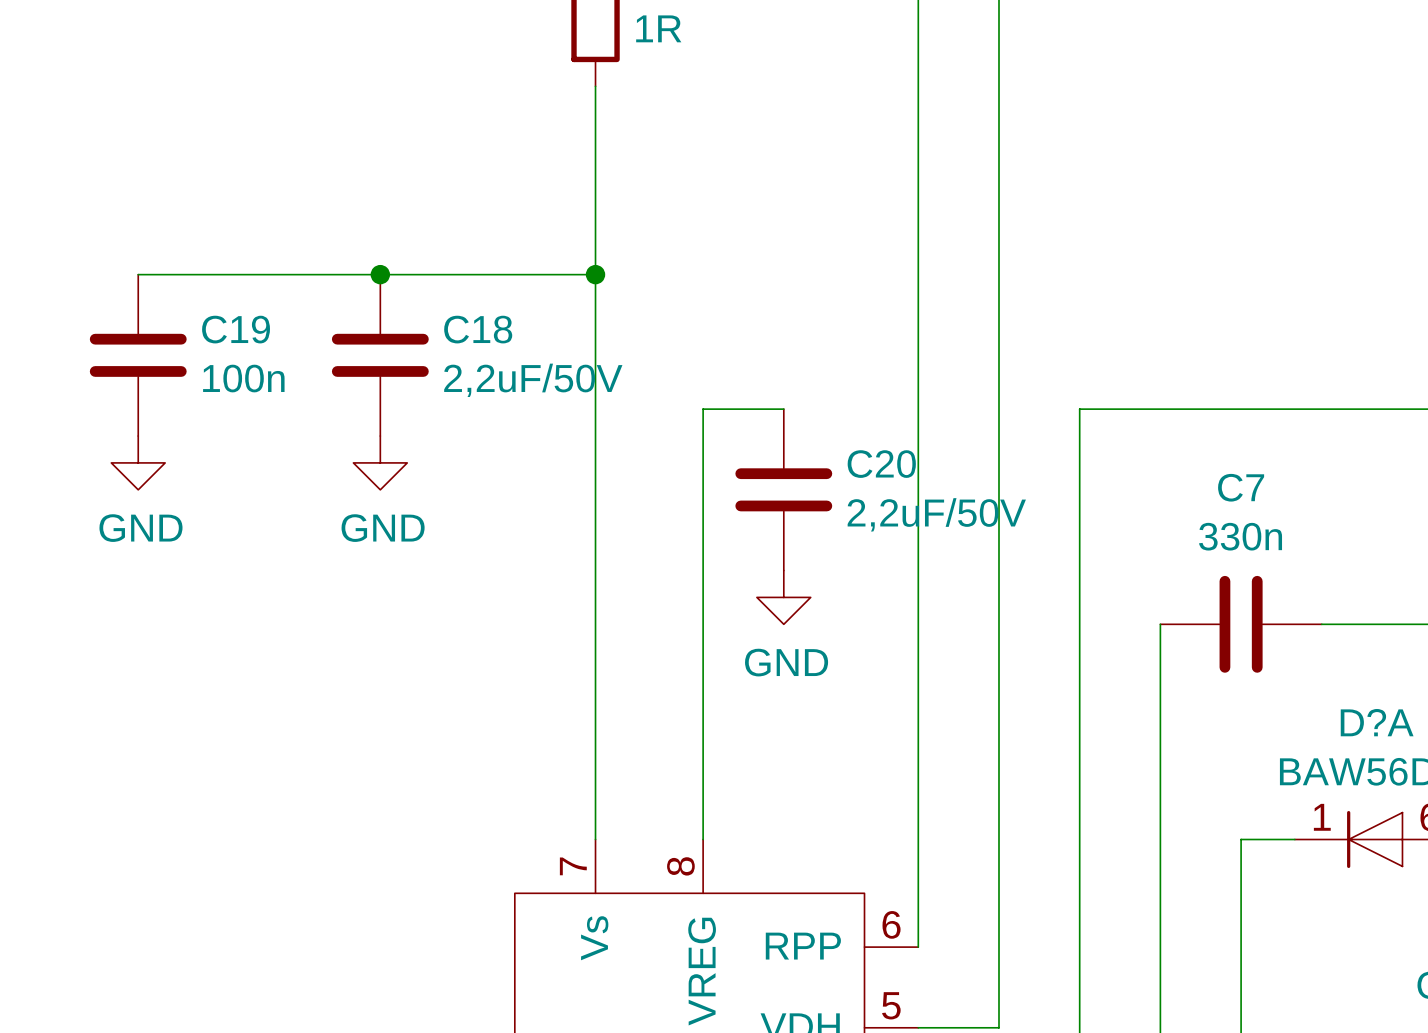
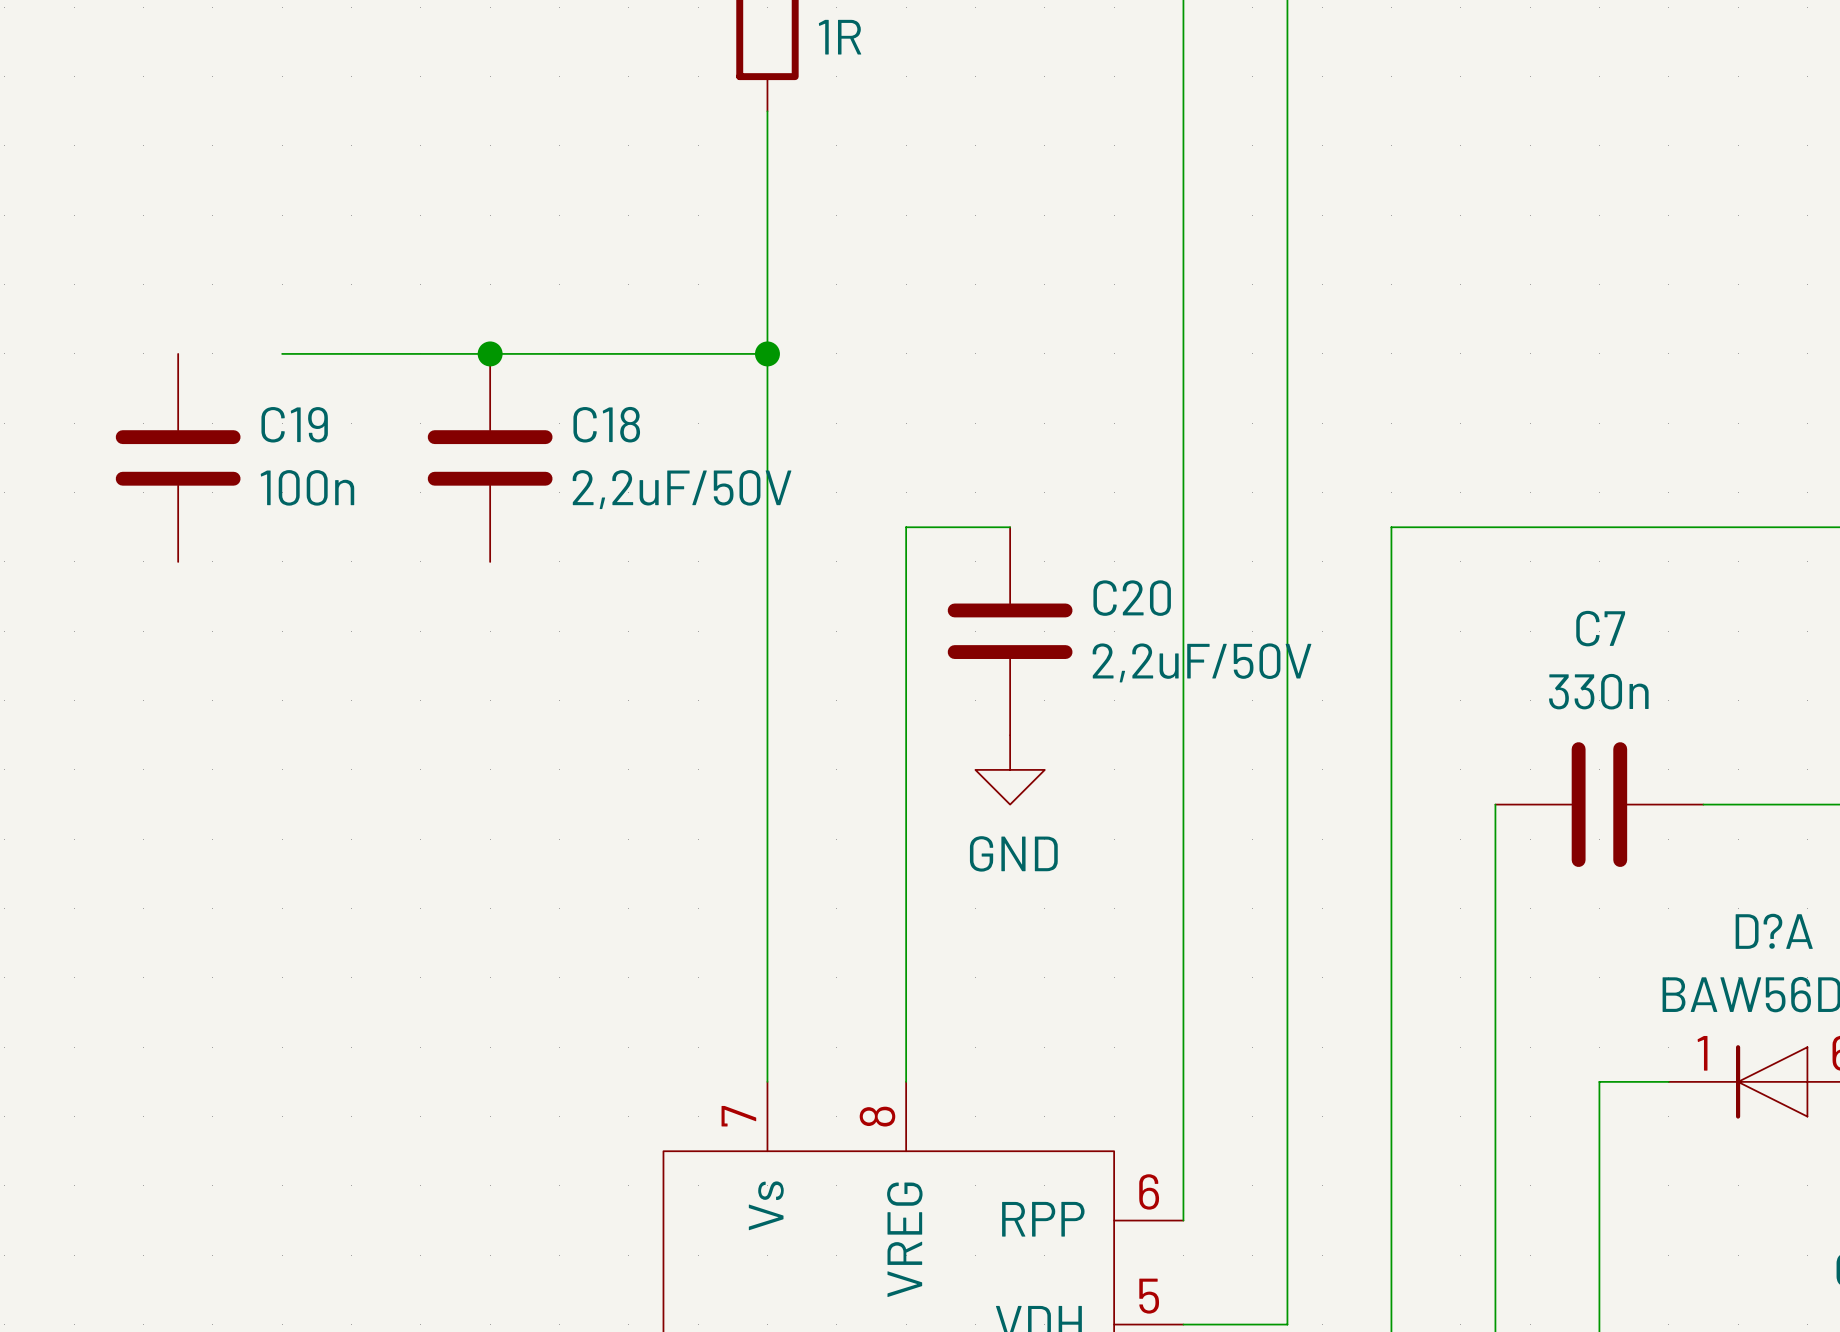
wire: (138, 274) (218, 274) -> none
power symbol: GND (138, 462) -> none
power symbol: GND (380, 462) -> none

